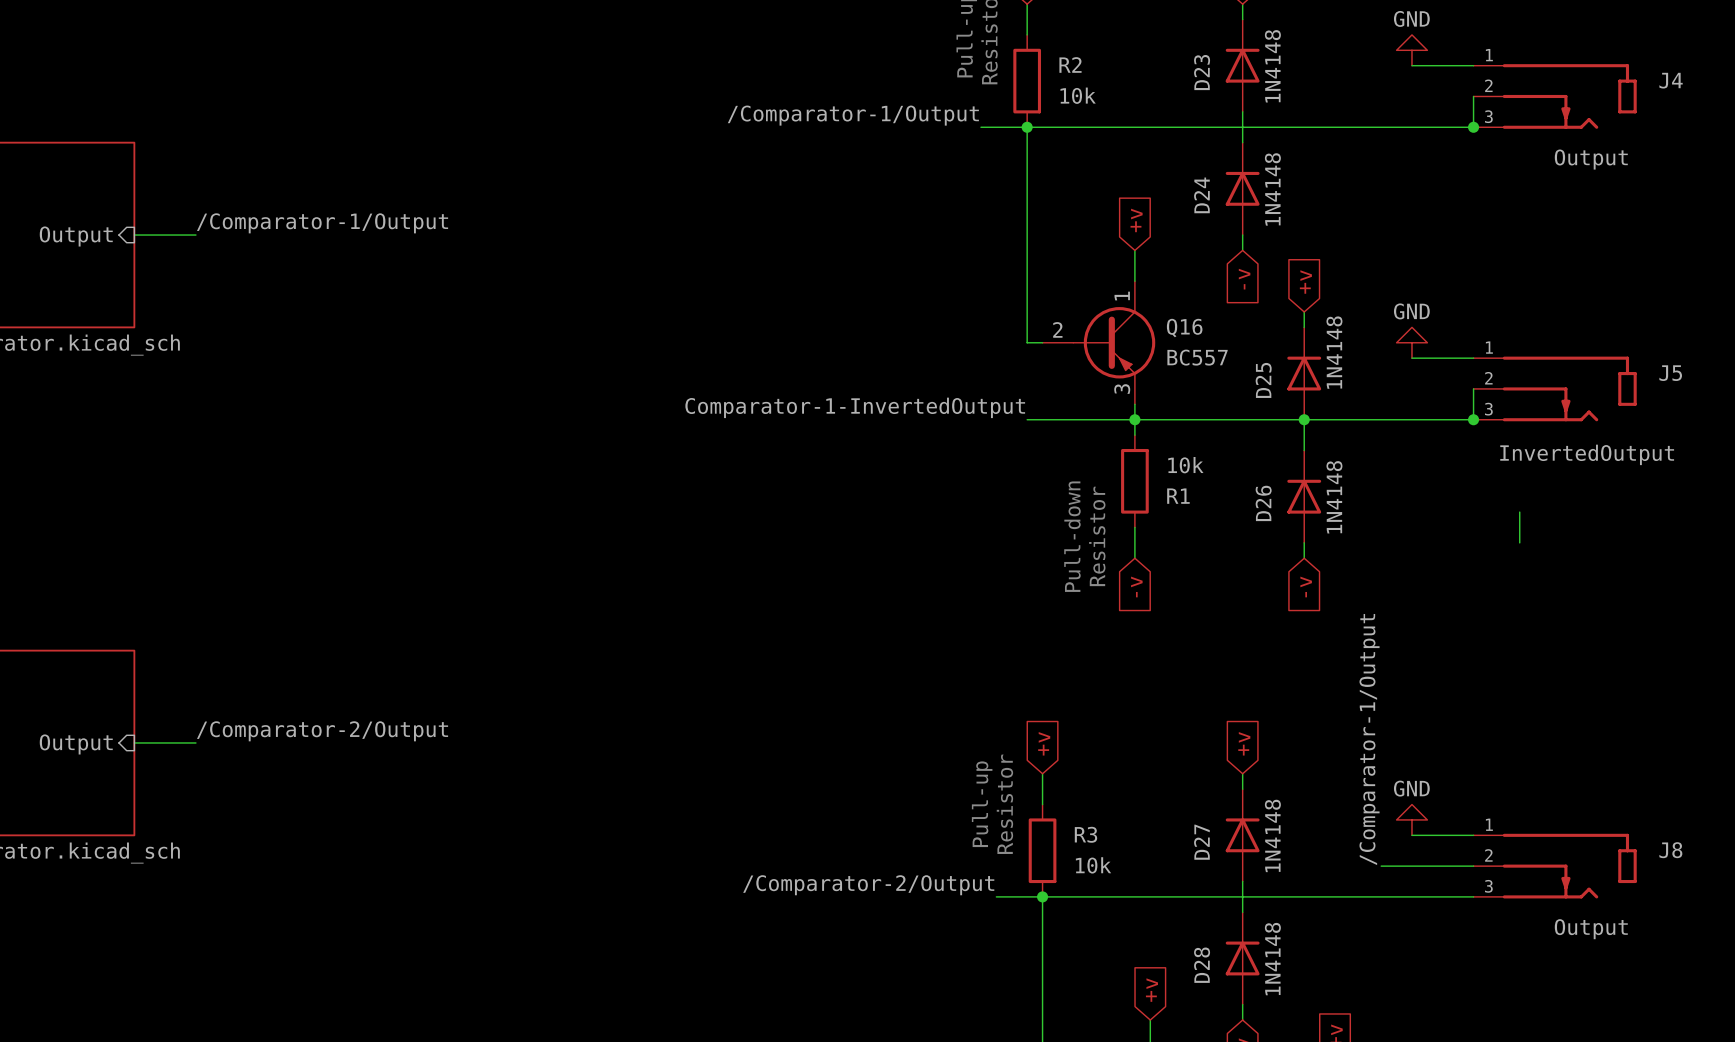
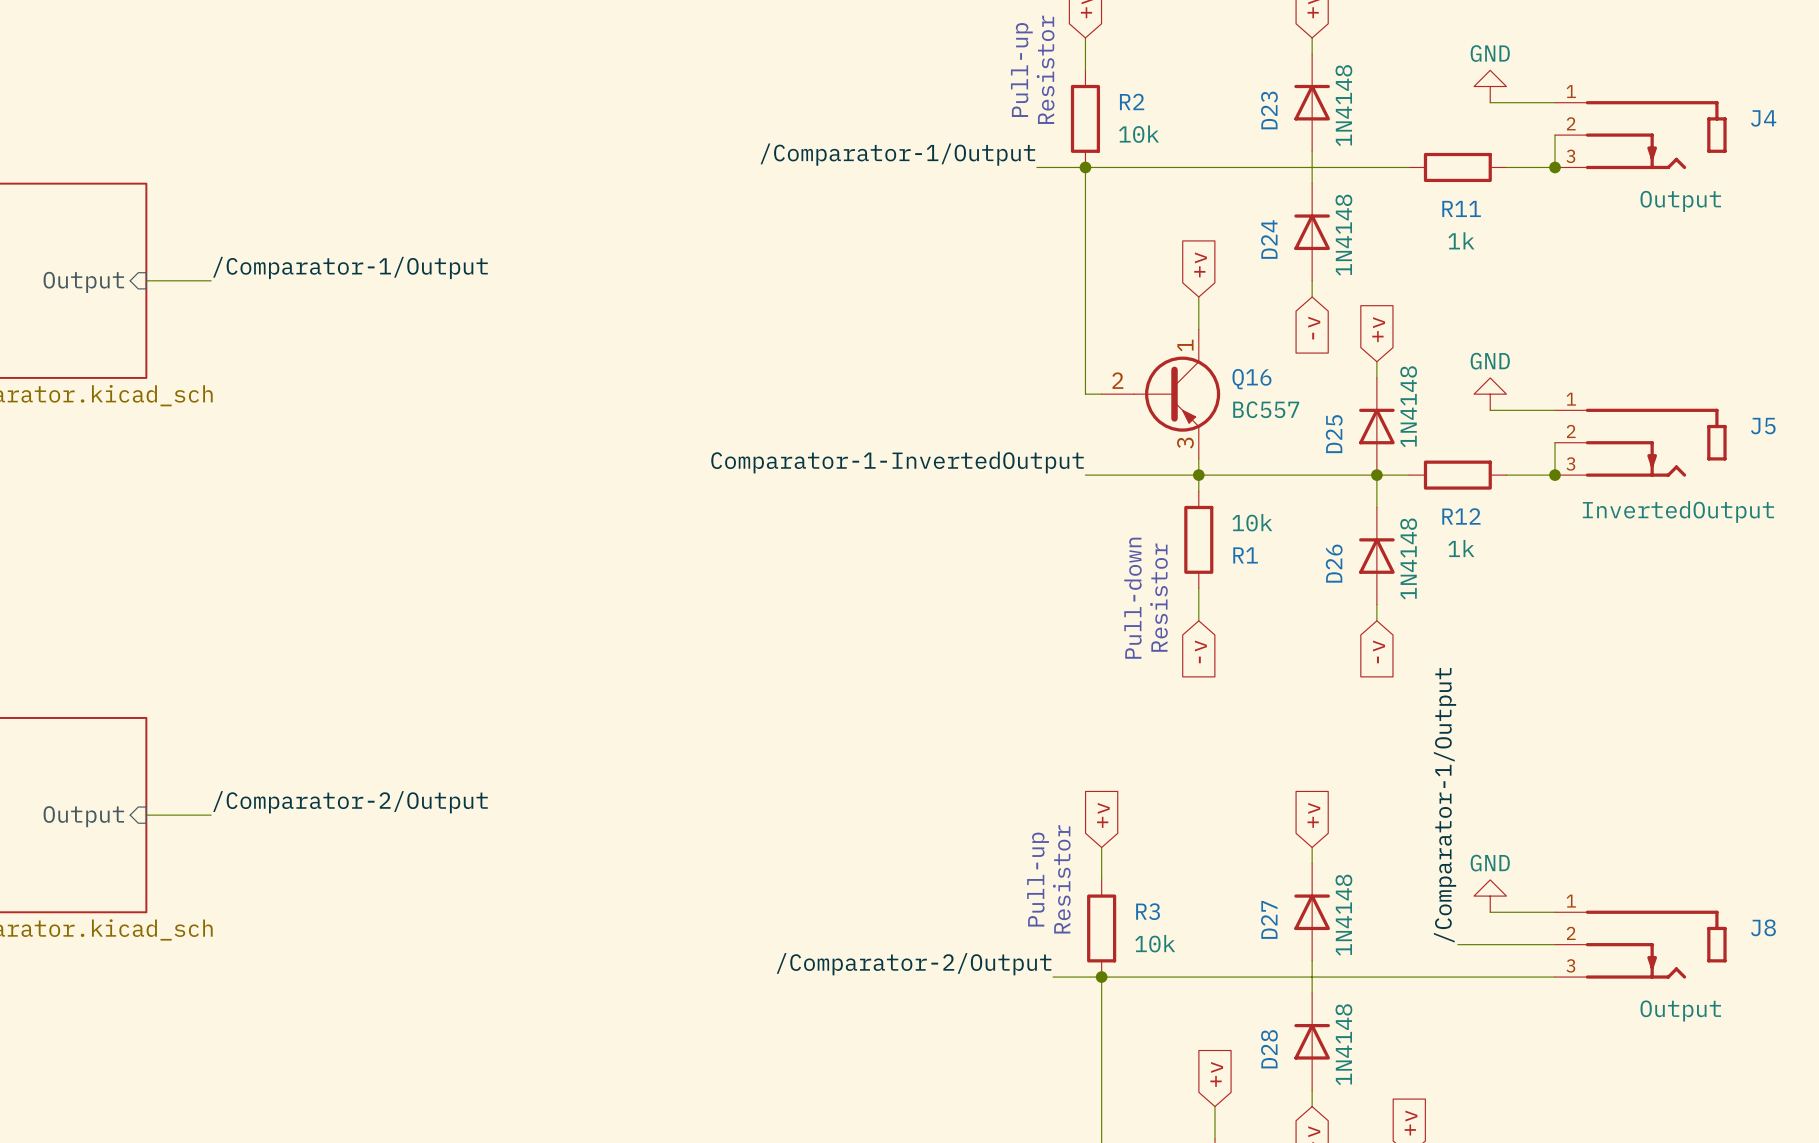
wire: (1335, 127) (1427, 127) -> none
R11: none -> 1k (1457, 167)
wire: (1335, 419) (1427, 419) -> none
R12: none -> 1k (1457, 475)
wire: (1519, 512) (1519, 542) -> none

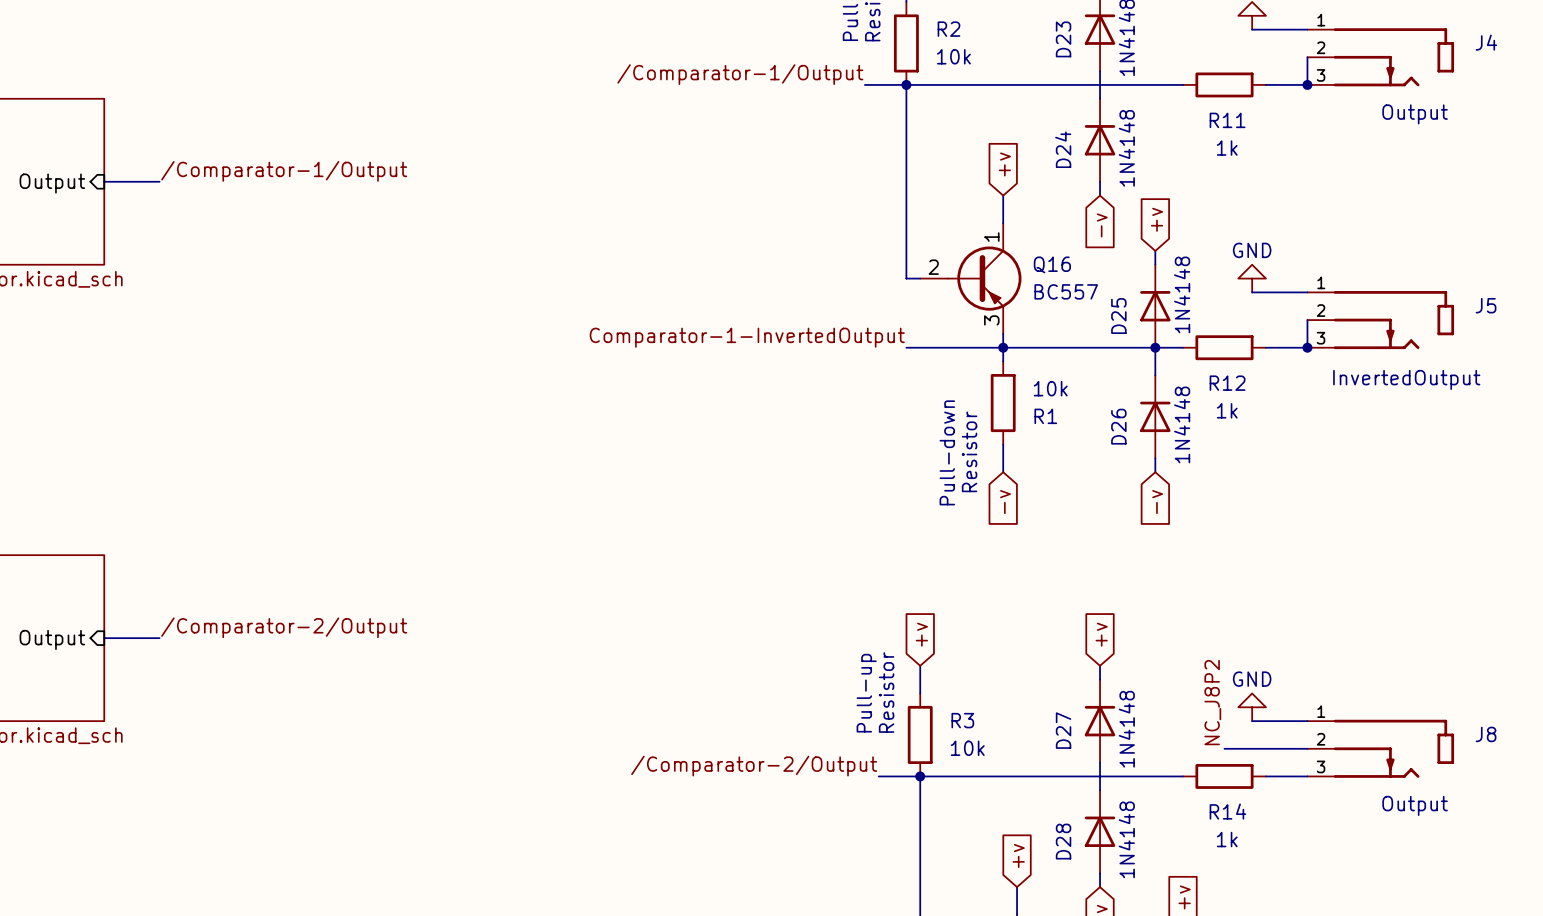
label: /Comparator-1/Output (1445, 805) -> NC_J8P2 (1212, 702)
wire: (1409, 977) (1506, 977) -> none
R14: none -> 1k (1224, 776)

